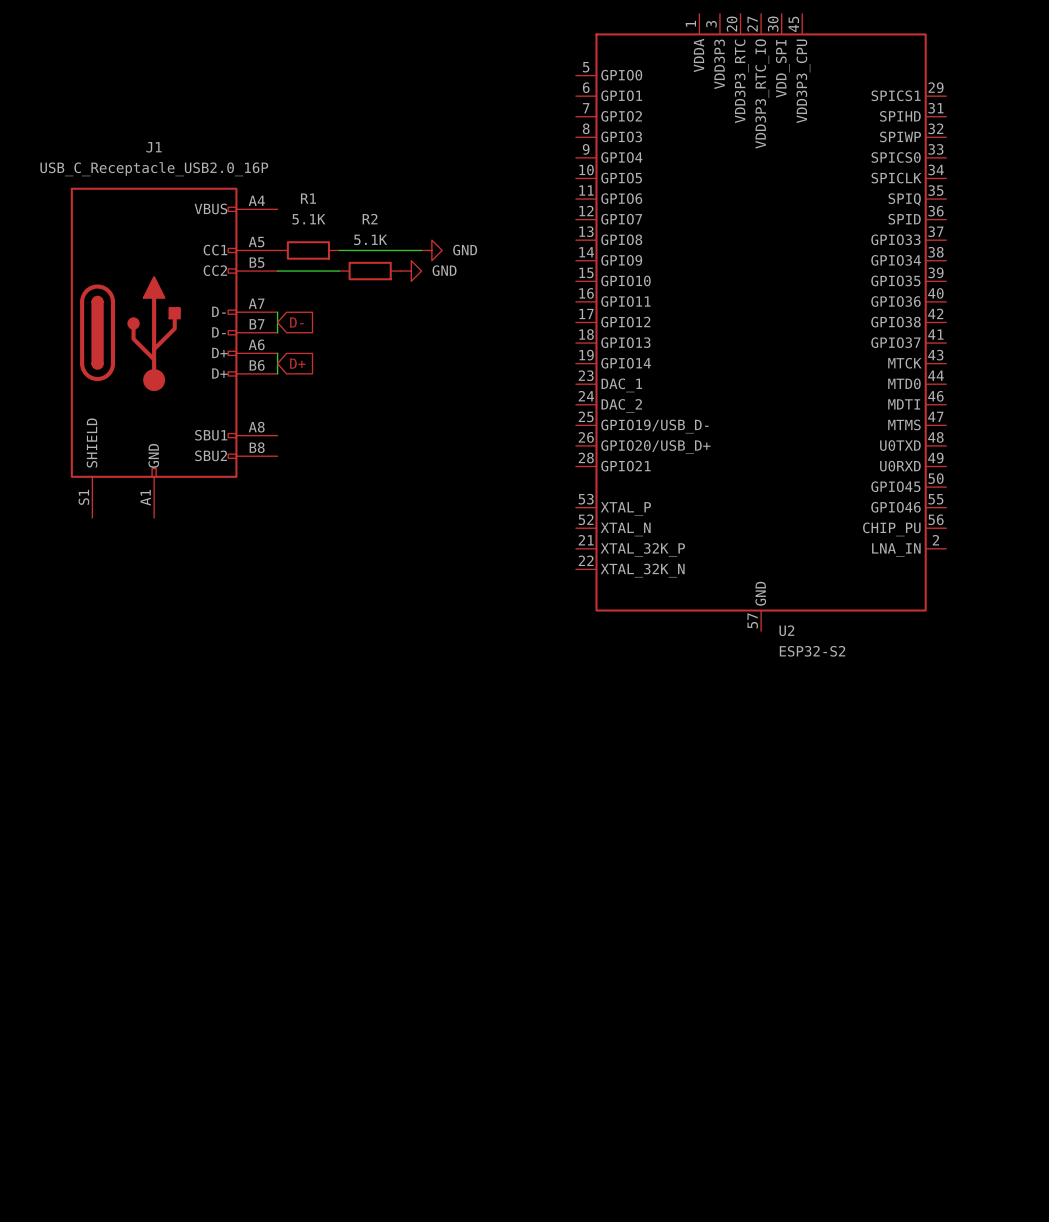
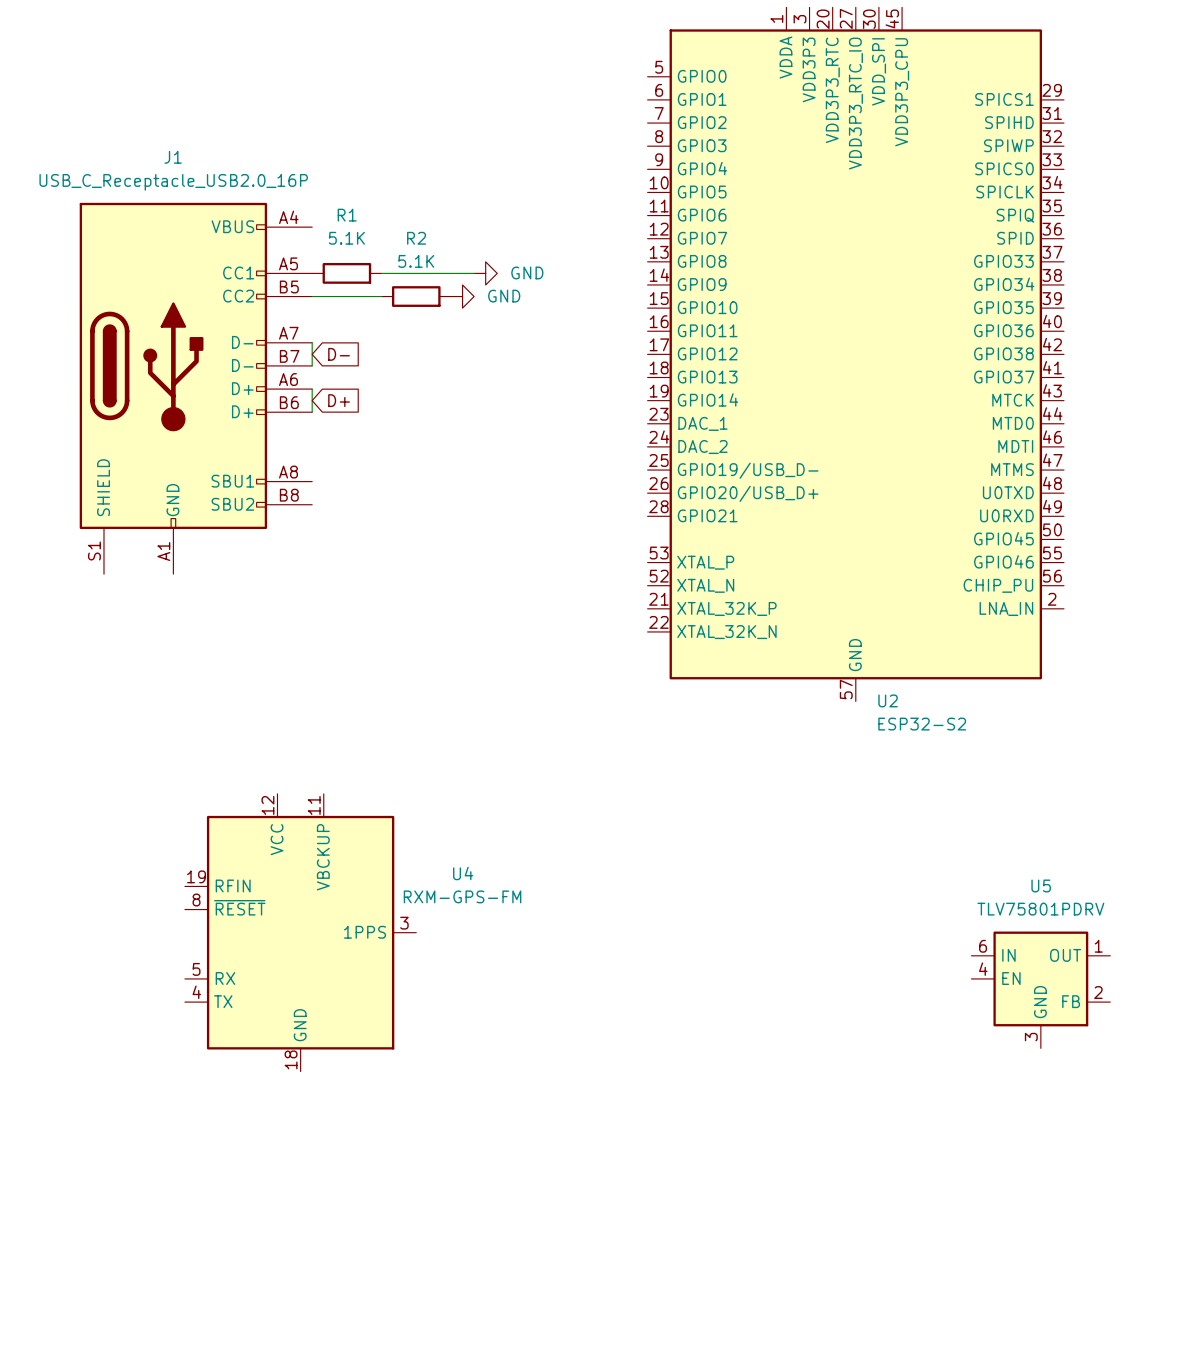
U4: none -> RXM-GPS-FM (300, 932)
U5: none -> TLV75801PDRV (1040, 989)

